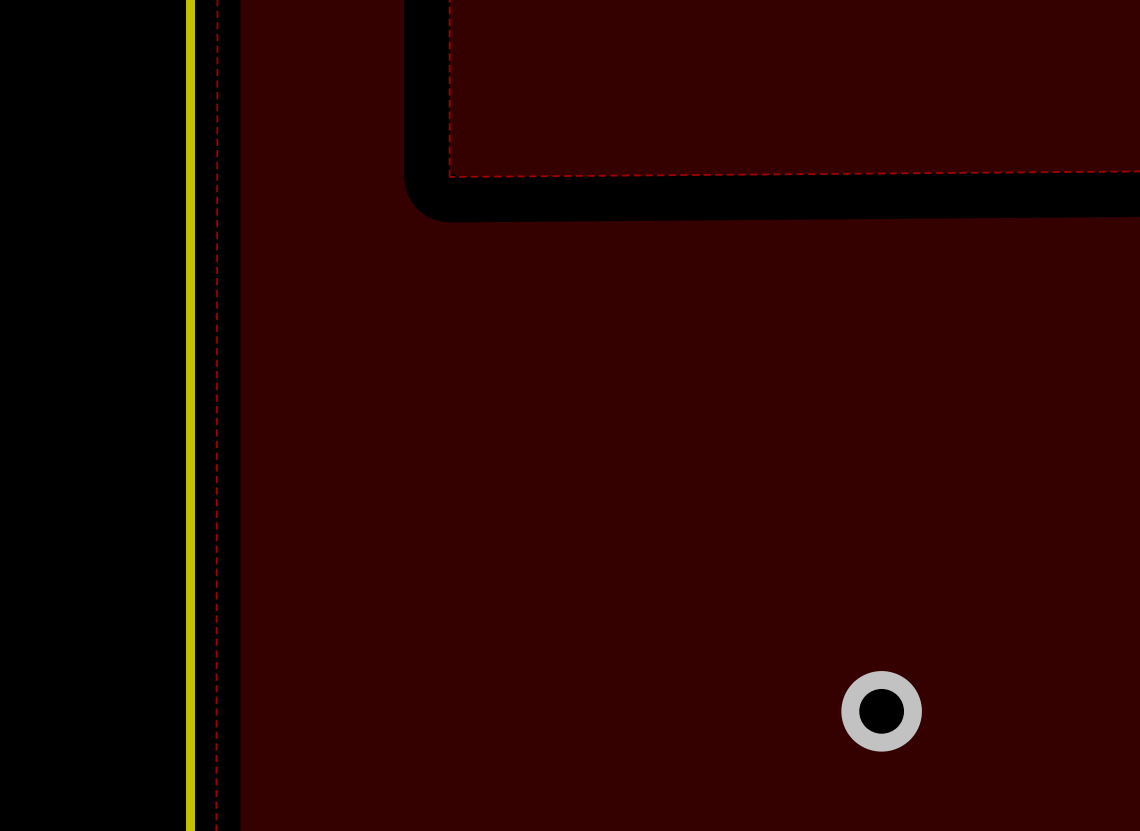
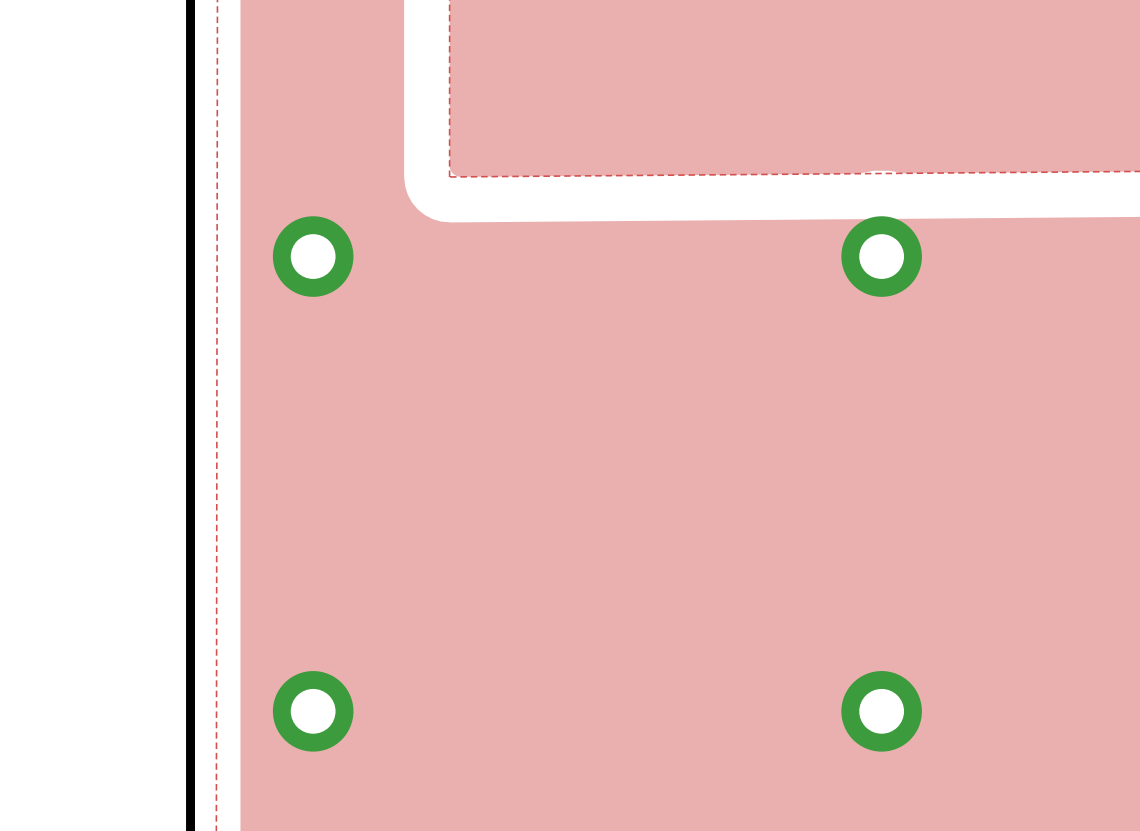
via: none -> (313, 256)
via: none -> (881, 256)
via: none -> (313, 711)

